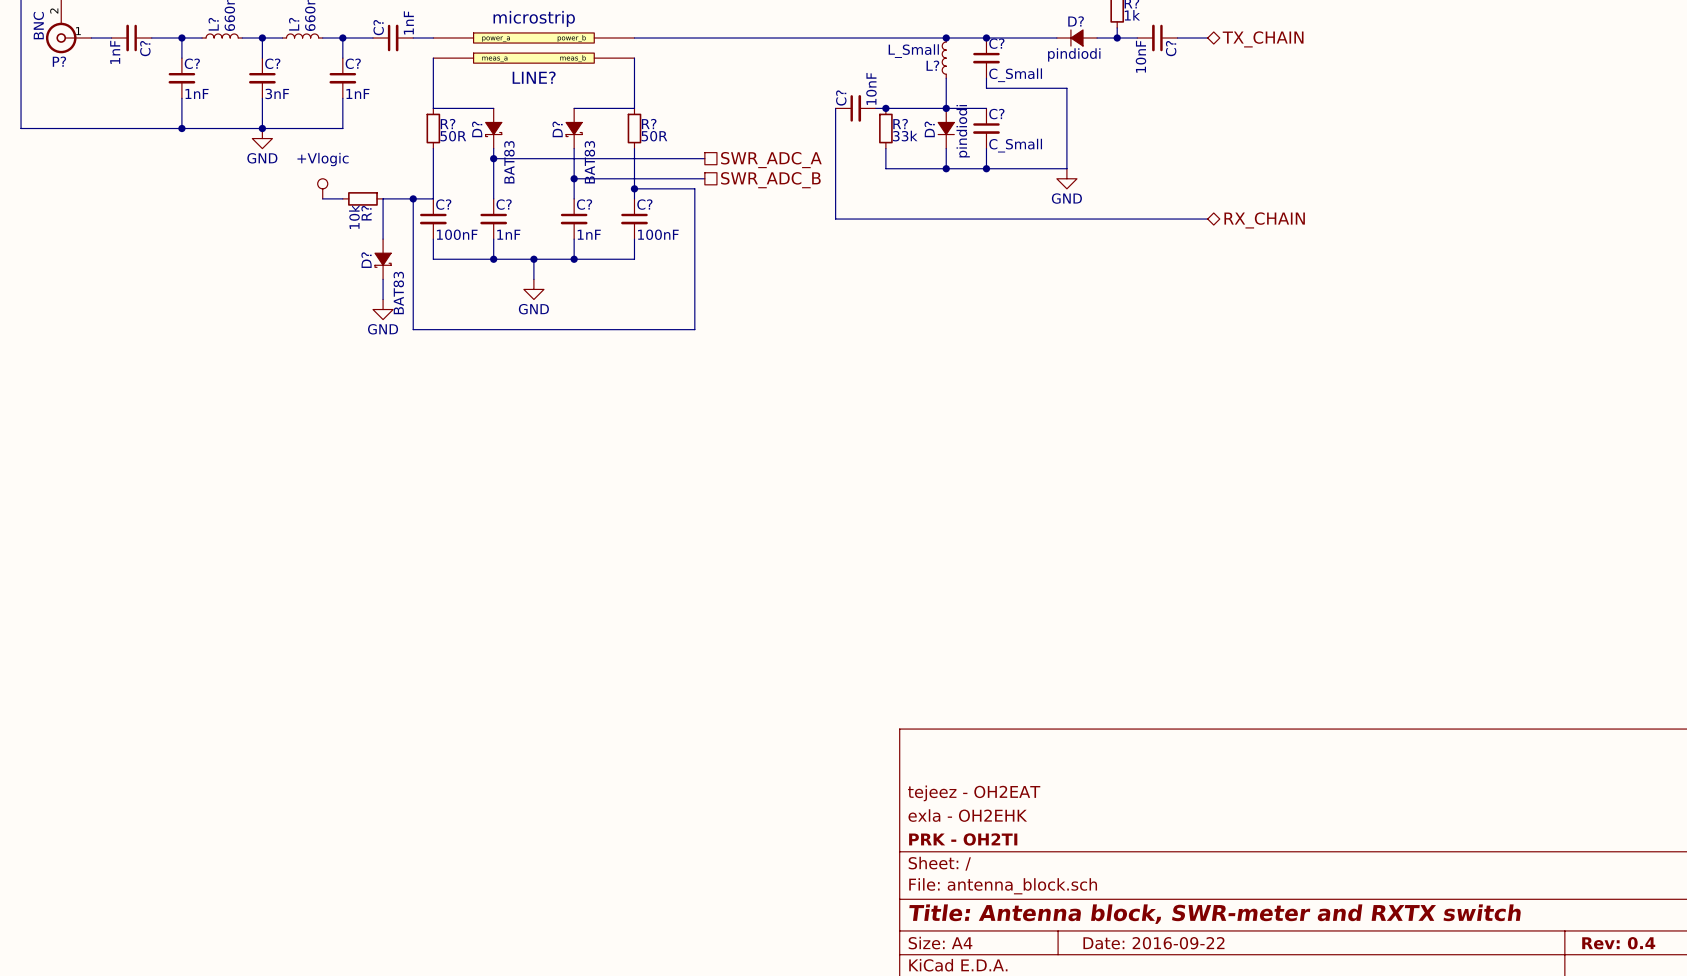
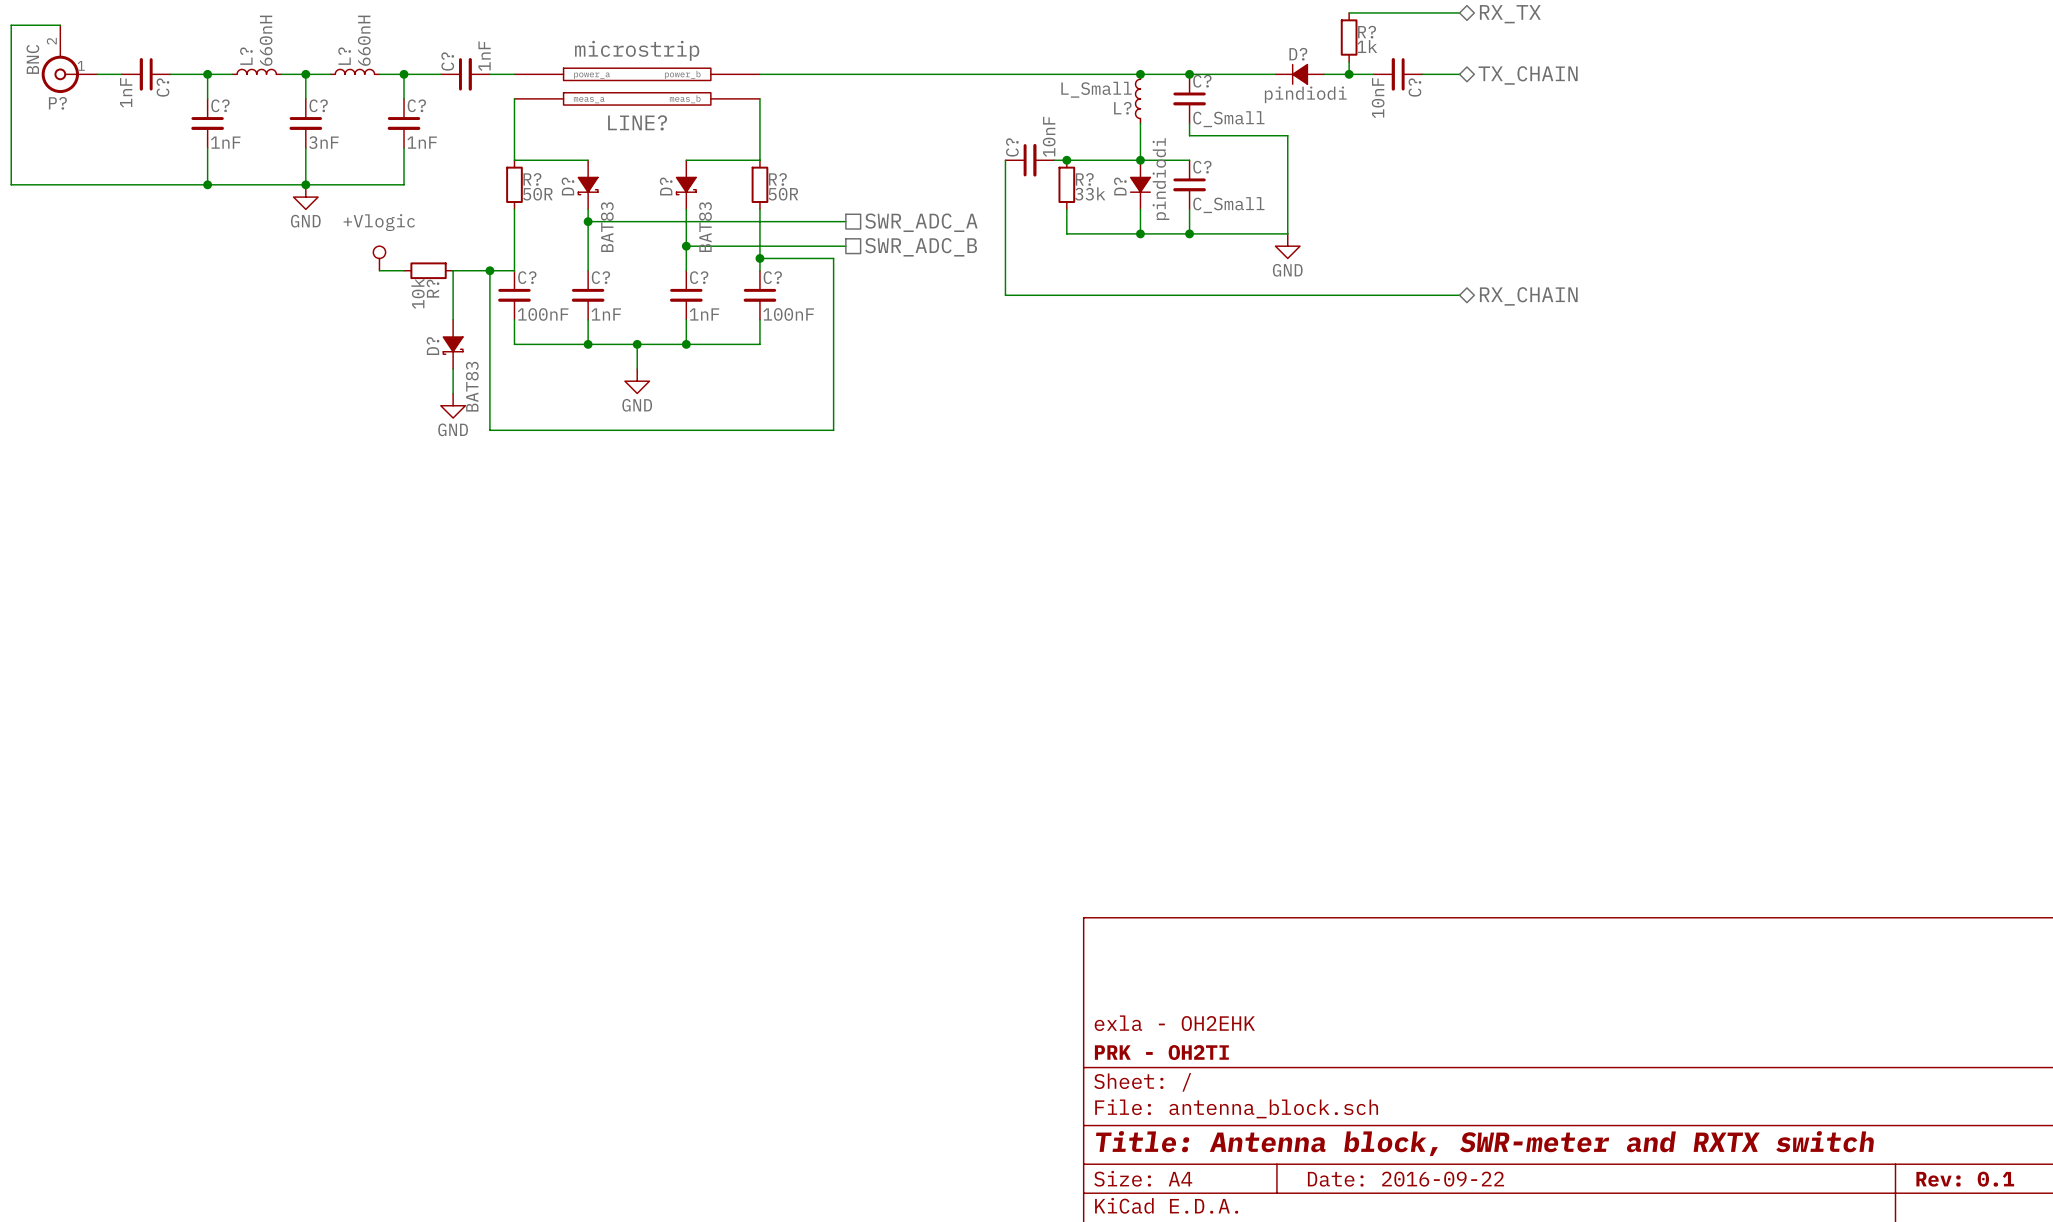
title block: tejeez - OH2EAT (974, 793) -> none
title block: Rev: 0.4 (1618, 943) -> Rev: 0.1 (1965, 1179)

